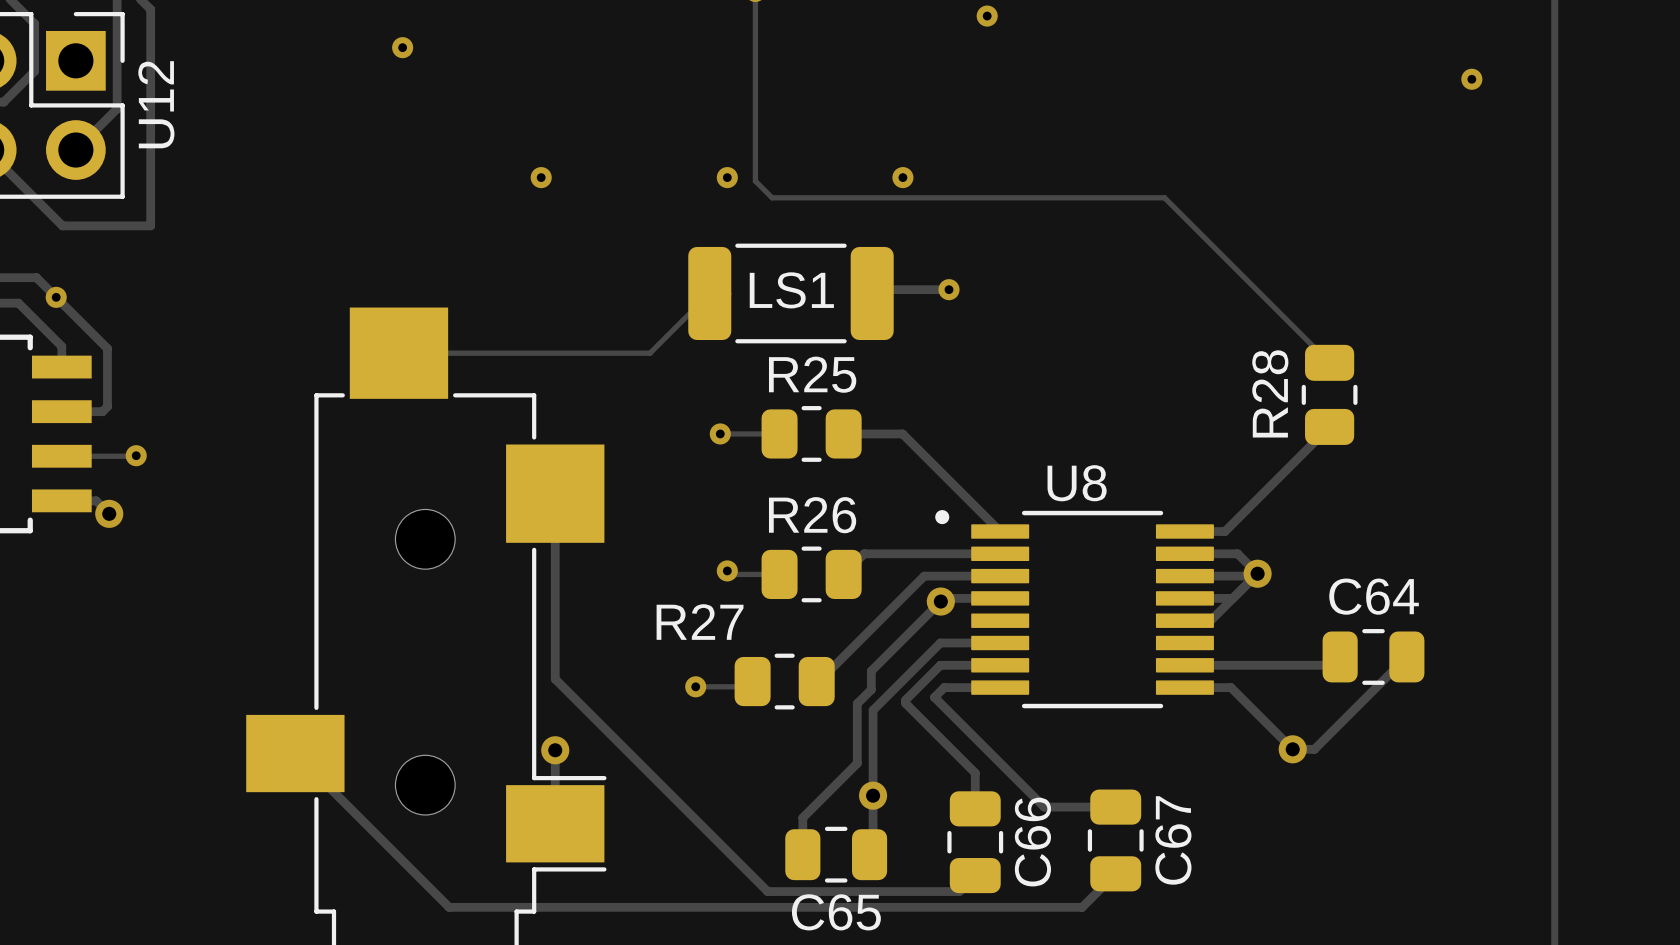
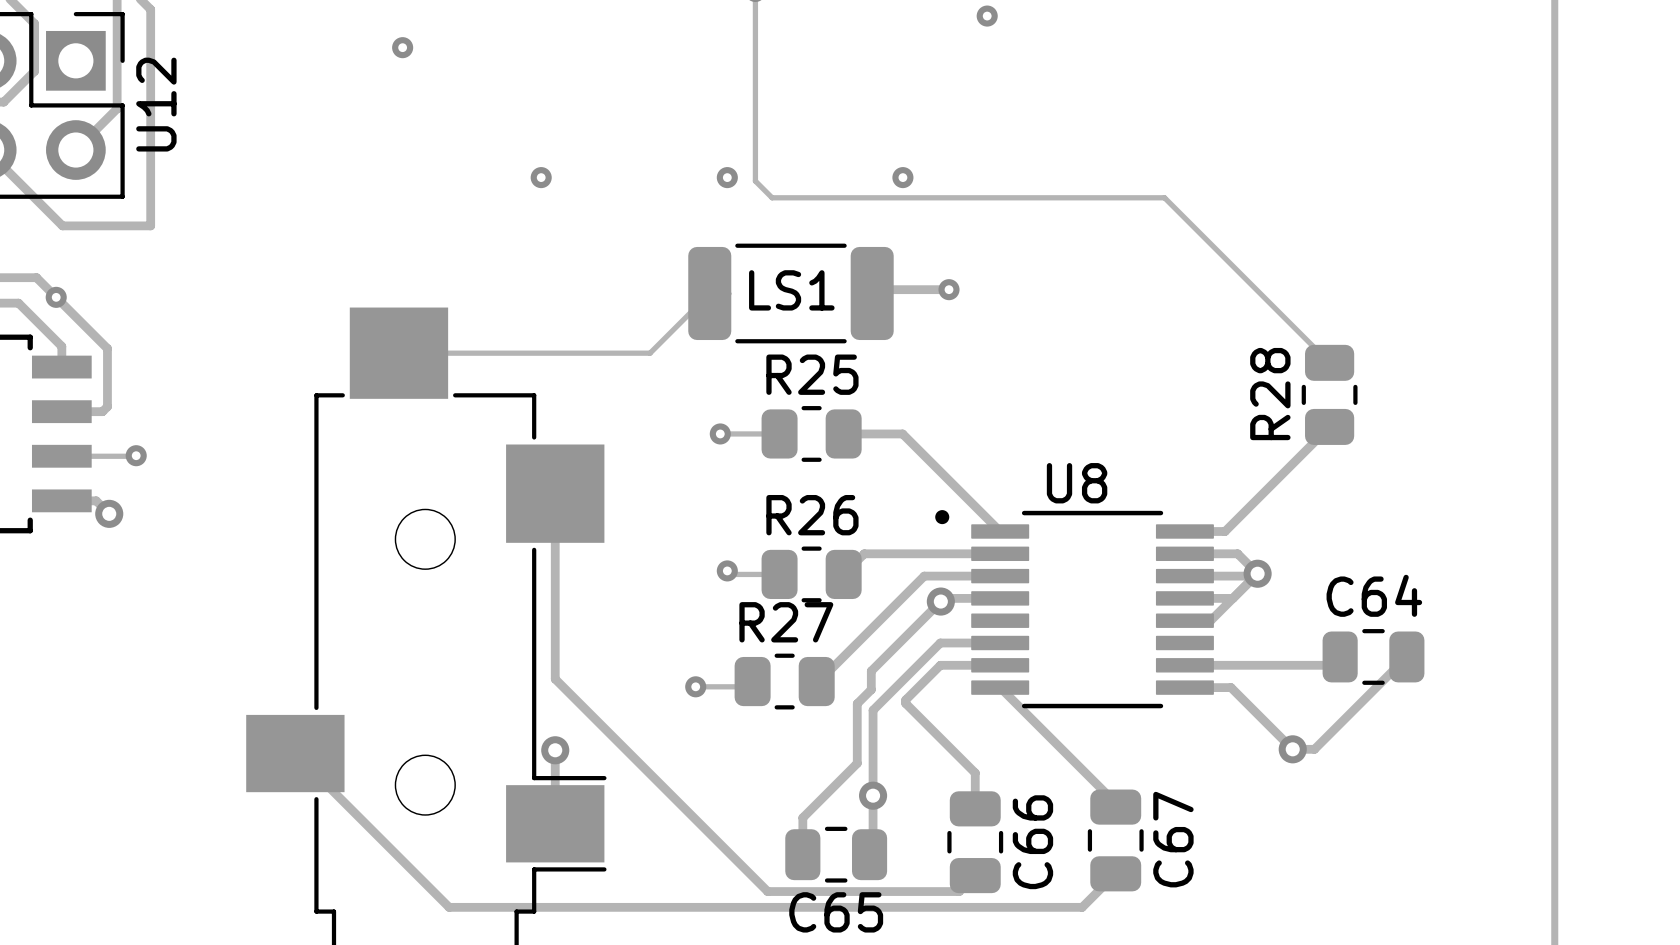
via: (1471, 79) -> none
R27 name position: R27 (700, 622) -> R27 (786, 622)
track: (1000, 687) (944, 687) (934, 697) (1044, 807) (1115, 807) -> (1000, 687) (1115, 803) (1115, 807)

